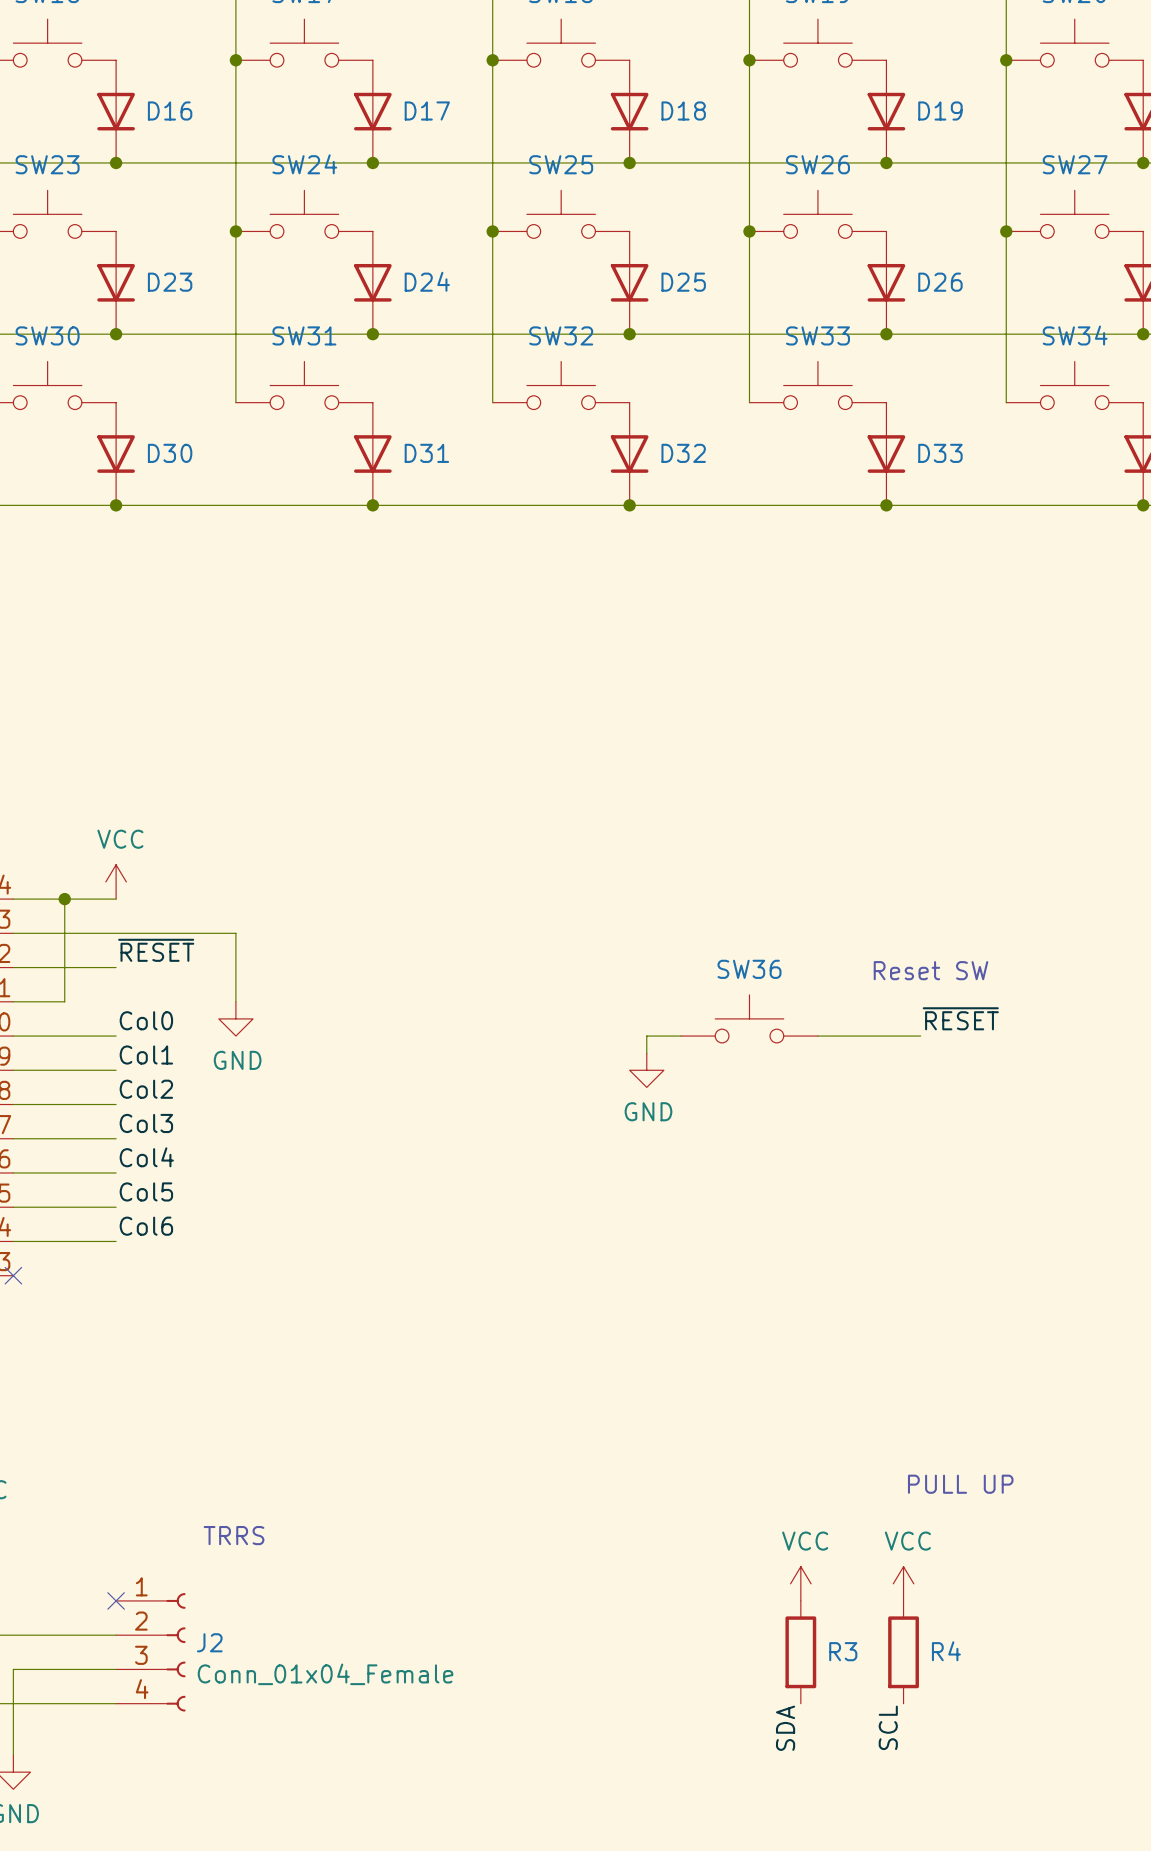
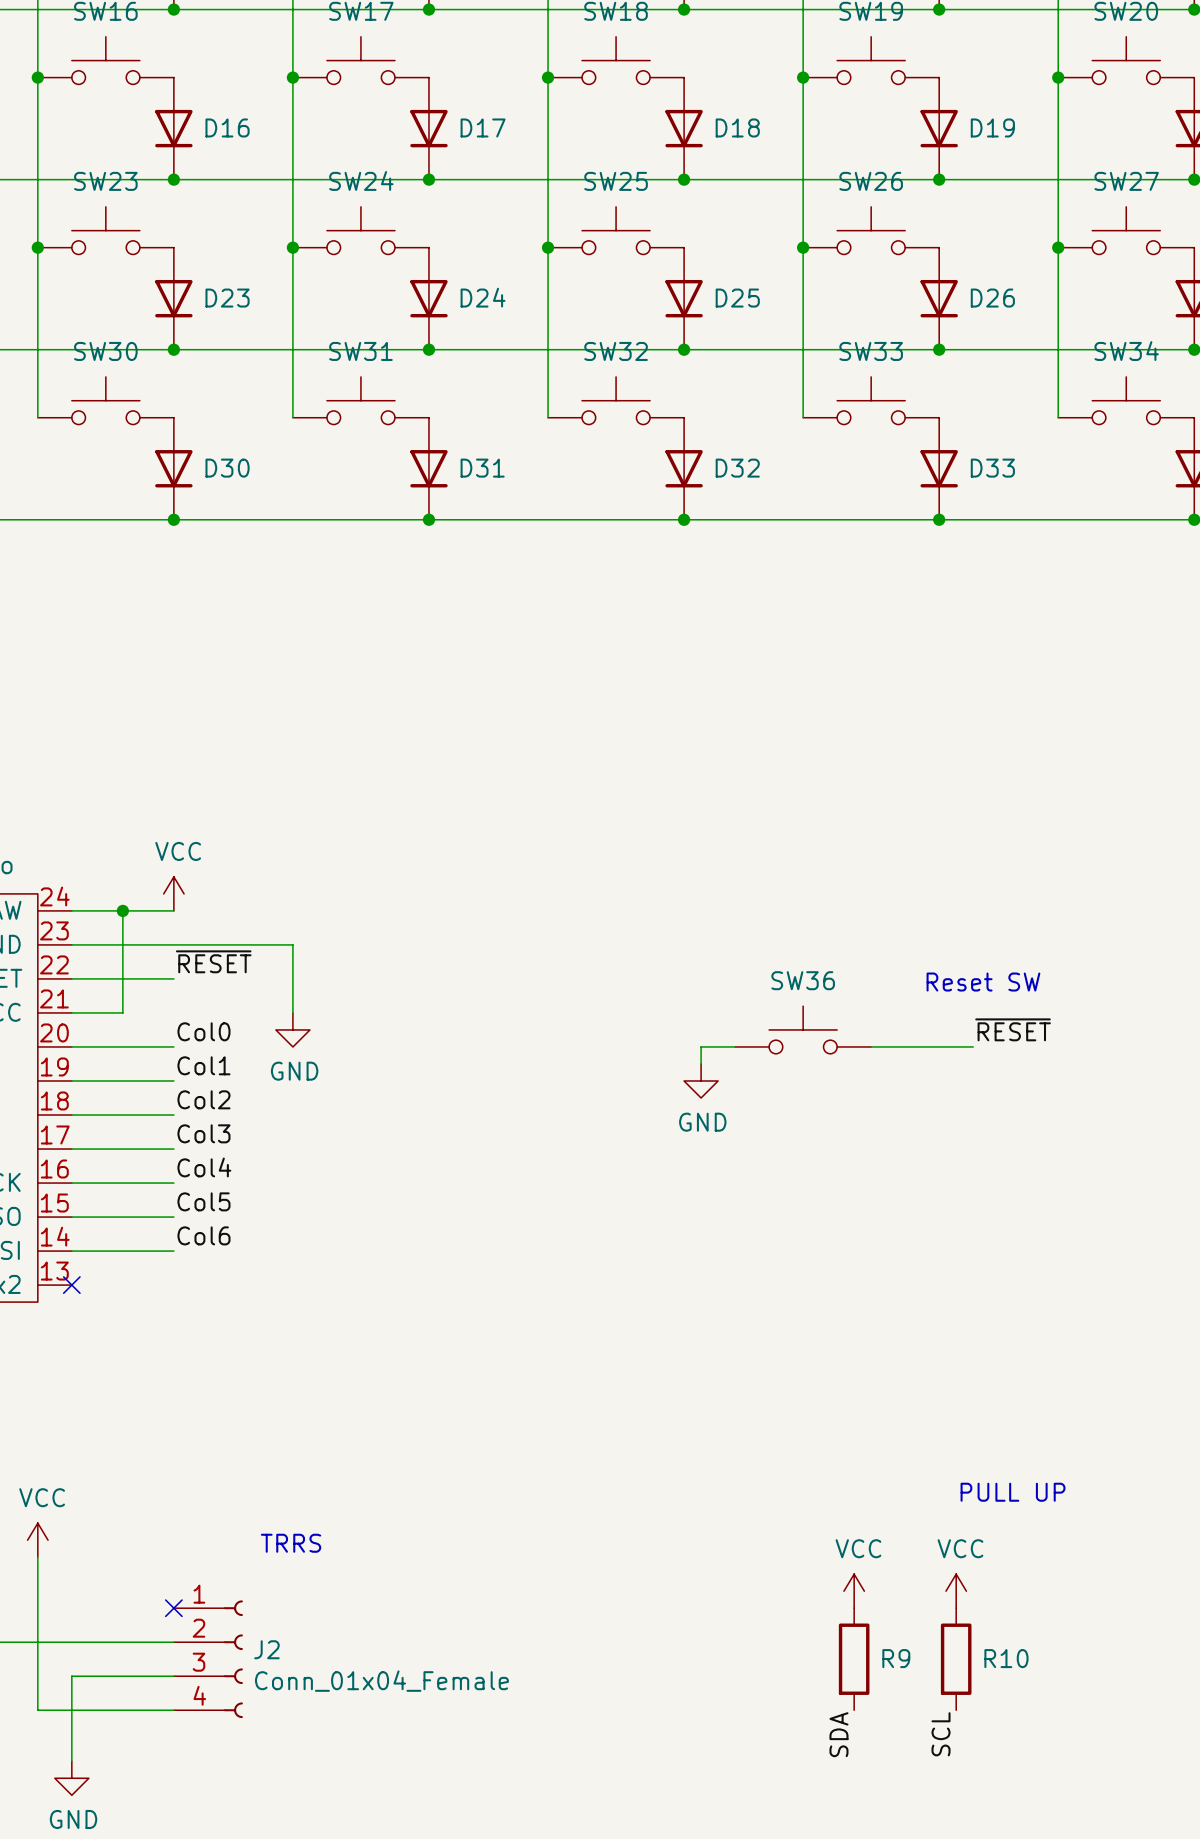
R3 name: R3 (843, 1651) -> R9 (896, 1658)
R4 name: R4 (946, 1651) -> R10 (1006, 1658)

